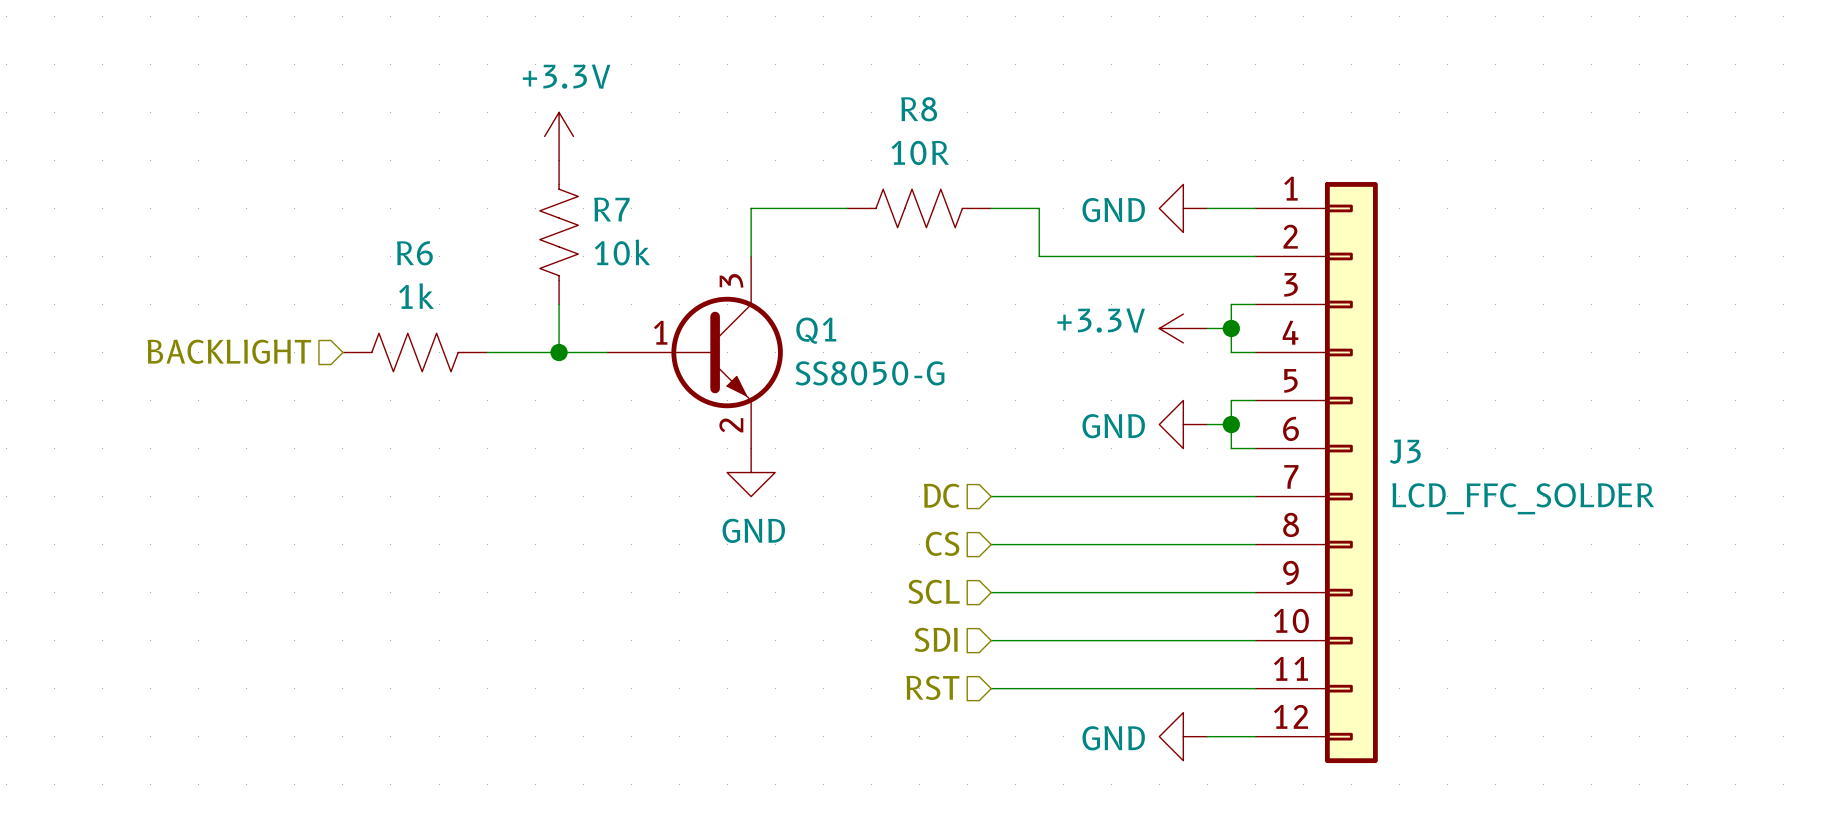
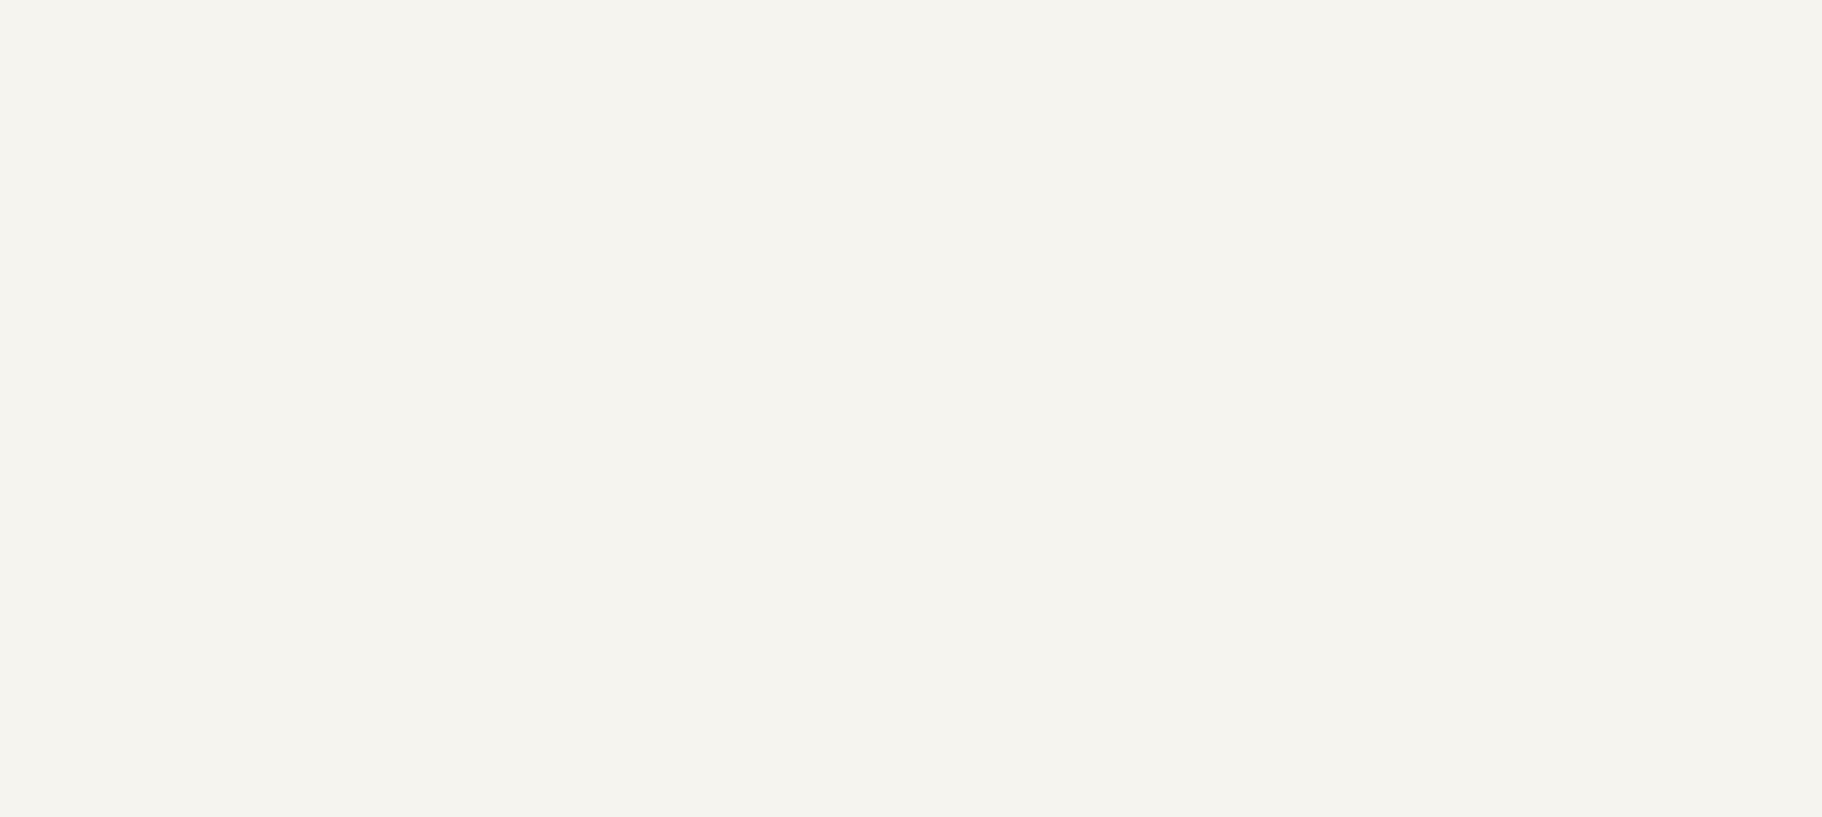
power symbol: +3.3V (559, 136) -> none
wire: (847, 208) (751, 208) (751, 256) -> none
R8: 10R (919, 208) -> none
wire: (991, 208) (1039, 208) (1039, 256) (1255, 256) -> none
power symbol: GND (1183, 208) -> none
wire: (1207, 208) (1255, 208) -> none
R7: 10k (559, 232) -> none
wire: (559, 304) (559, 352) -> none
wire: (1255, 304) (1231, 304) (1231, 352) (1255, 352) -> none
power symbol: +3.3V (1183, 328) -> none
wire: (1207, 328) (1231, 328) -> none
junction: (1231, 328) -> none
hierarchical label: BACKLIGHT (229, 351) -> none
R6: 1k (415, 352) -> none
wire: (487, 352) (607, 352) -> none
junction: (559, 352) -> none
Q1: SS8050-G (694, 352) -> none
wire: (1255, 400) (1231, 400) (1231, 448) (1255, 448) -> none
power symbol: GND (1183, 424) -> none
wire: (1207, 424) (1231, 424) -> none
junction: (1231, 424) -> none
power symbol: GND (751, 472) -> none
J3: LCD_FFC_SOLDER (1316, 472) -> none
hierarchical label: DC (941, 495) -> none
wire: (991, 496) (1255, 496) -> none
hierarchical label: CS (942, 543) -> none
wire: (991, 544) (1255, 544) -> none
hierarchical label: SCL (934, 591) -> none
wire: (991, 592) (1255, 592) -> none
hierarchical label: SDI (936, 639) -> none
wire: (991, 640) (1255, 640) -> none
hierarchical label: RST (932, 687) -> none
wire: (991, 688) (1255, 688) -> none
power symbol: GND (1183, 736) -> none
wire: (1207, 736) (1255, 736) -> none

